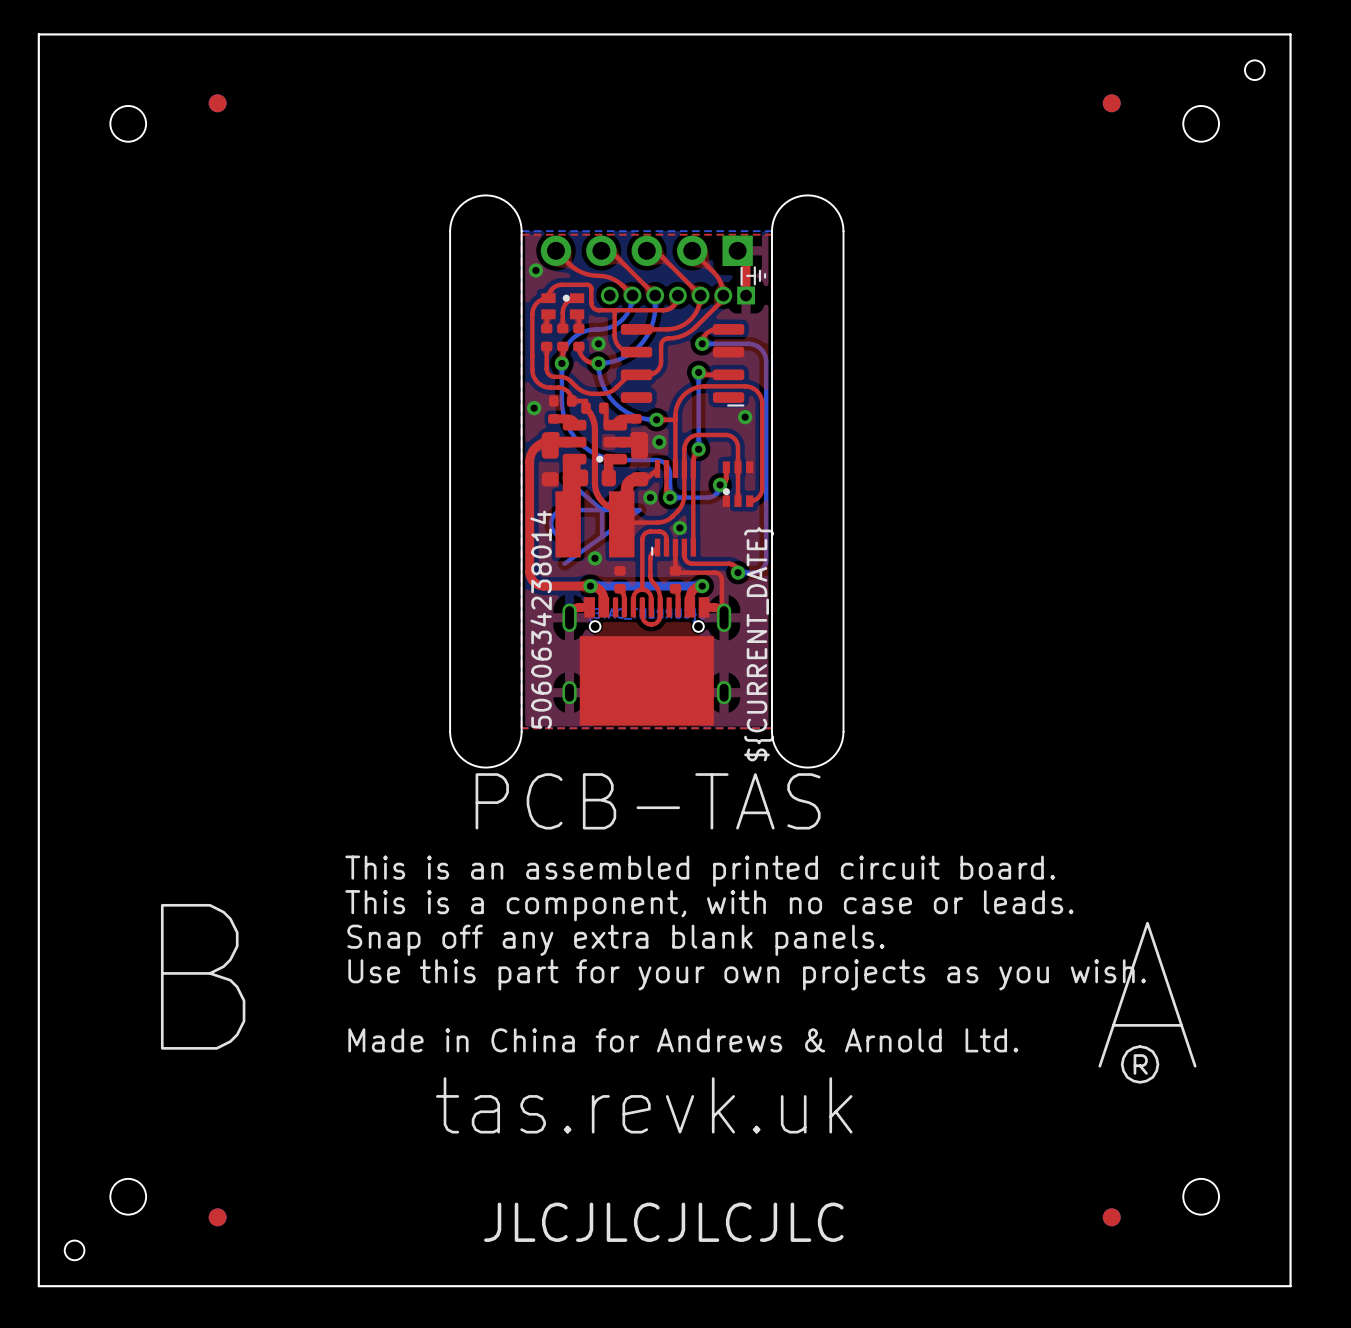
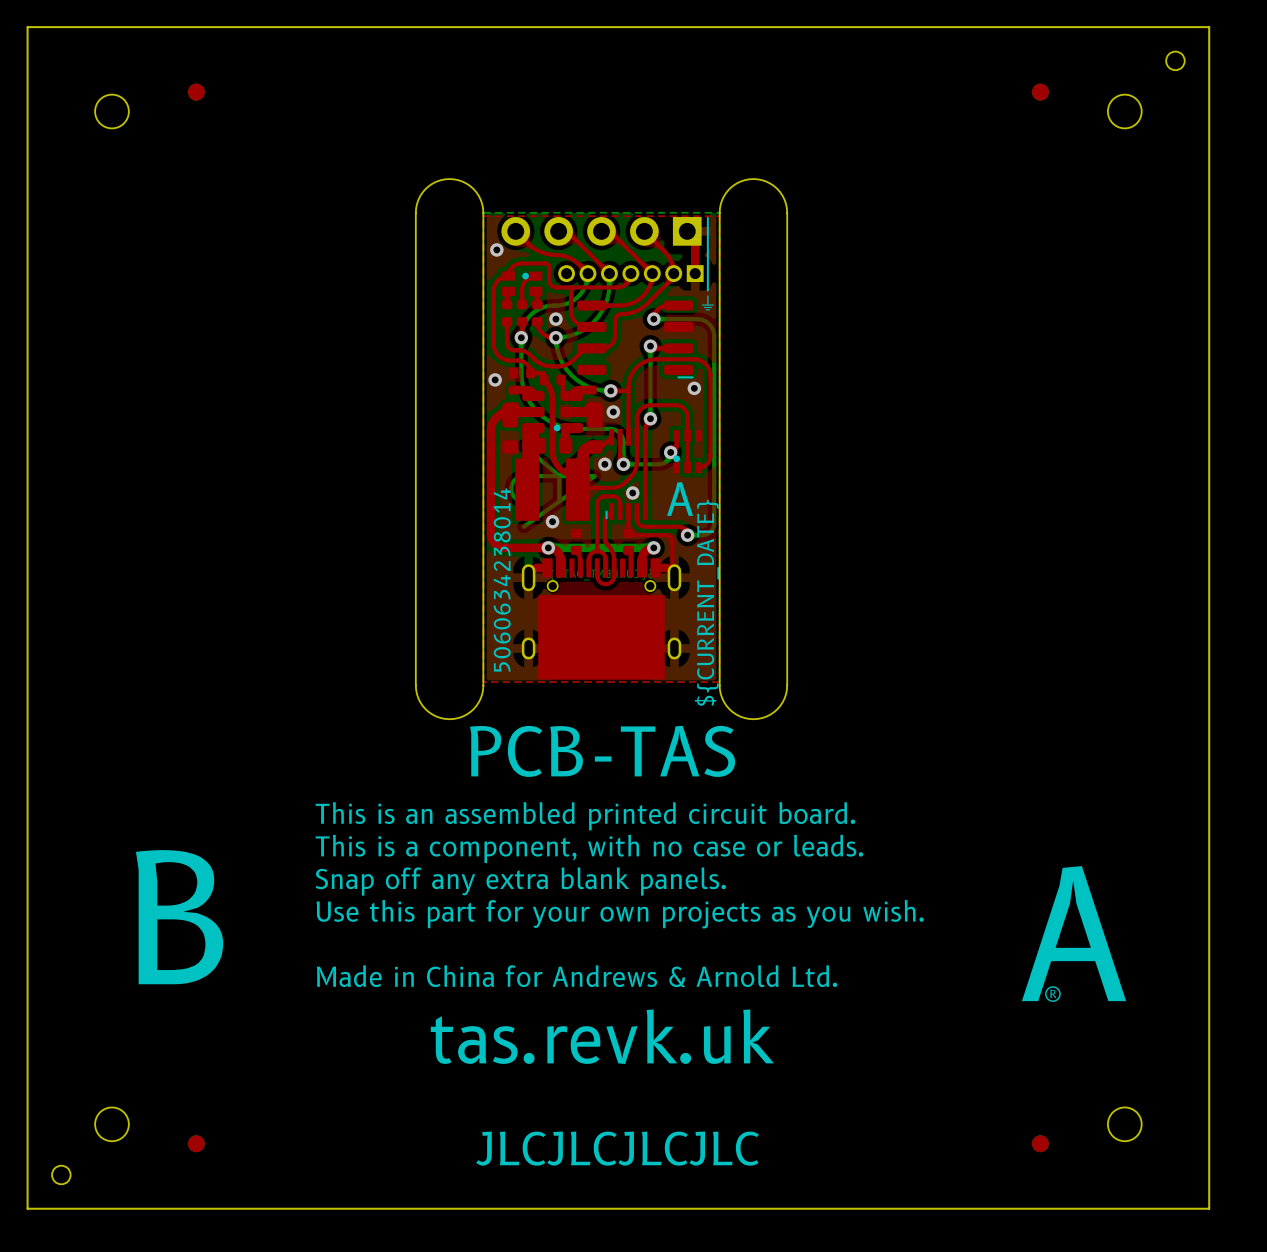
line: none -> (707, 217) (707, 290)
line: (741, 267) (741, 284) -> none
text rotation: 0° (756, 275) -> 90° clockwise (707, 302)
text position: ⏚ (756, 275) -> ⏚ (707, 302)
text: none -> A (680, 499)

